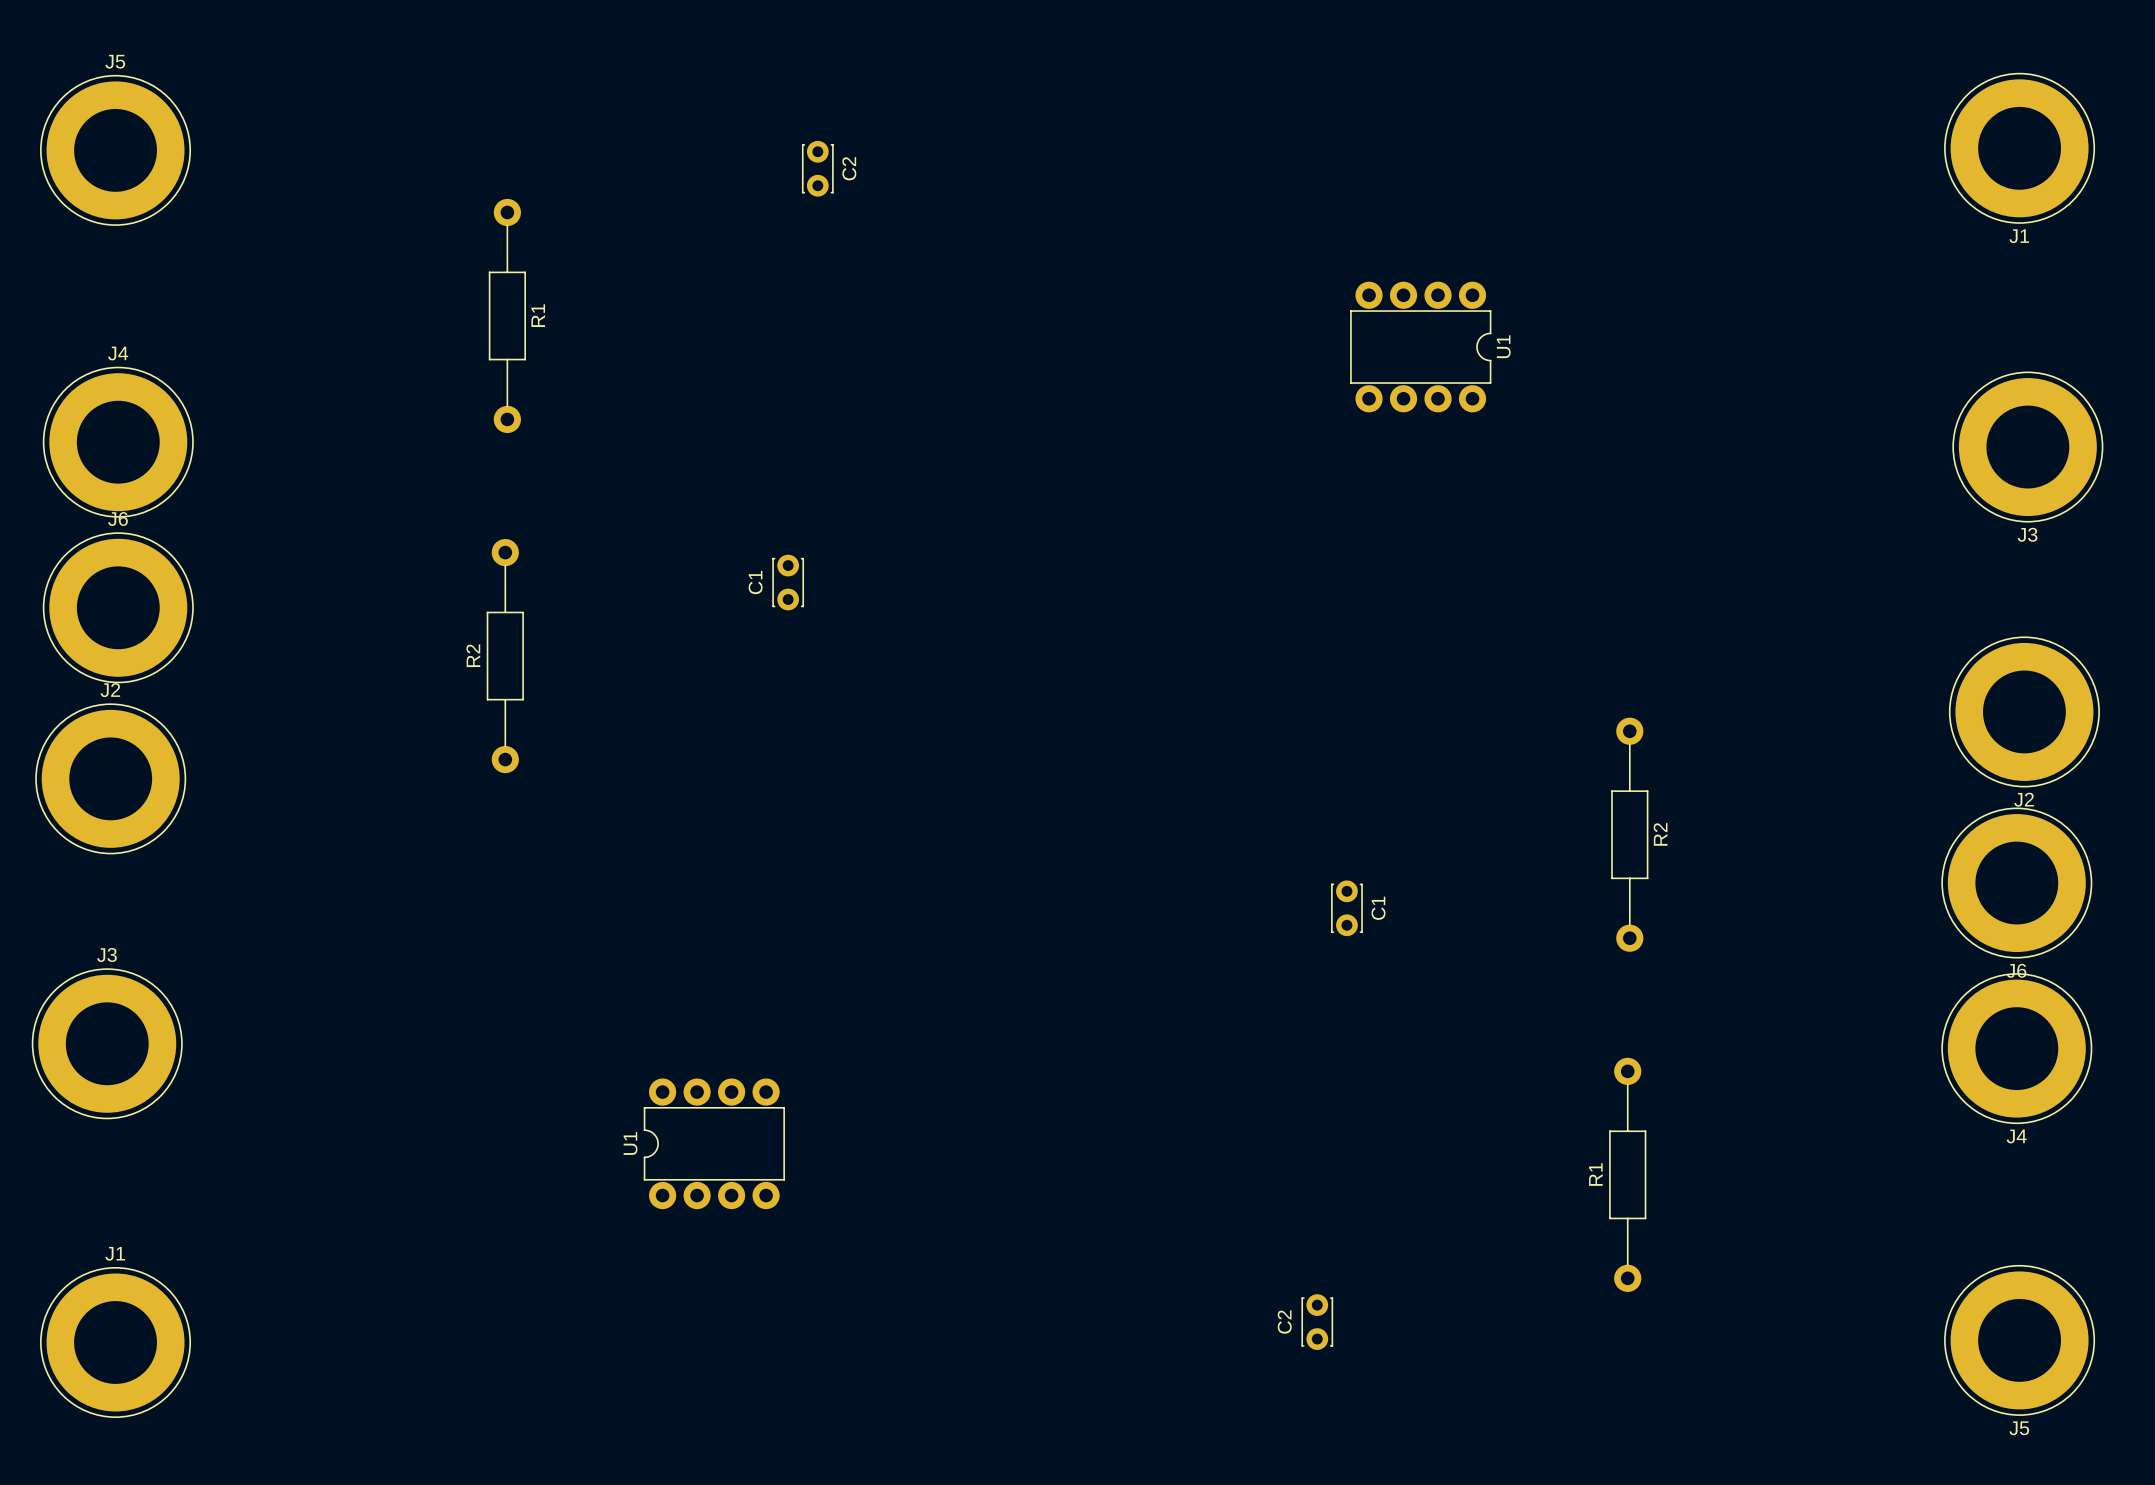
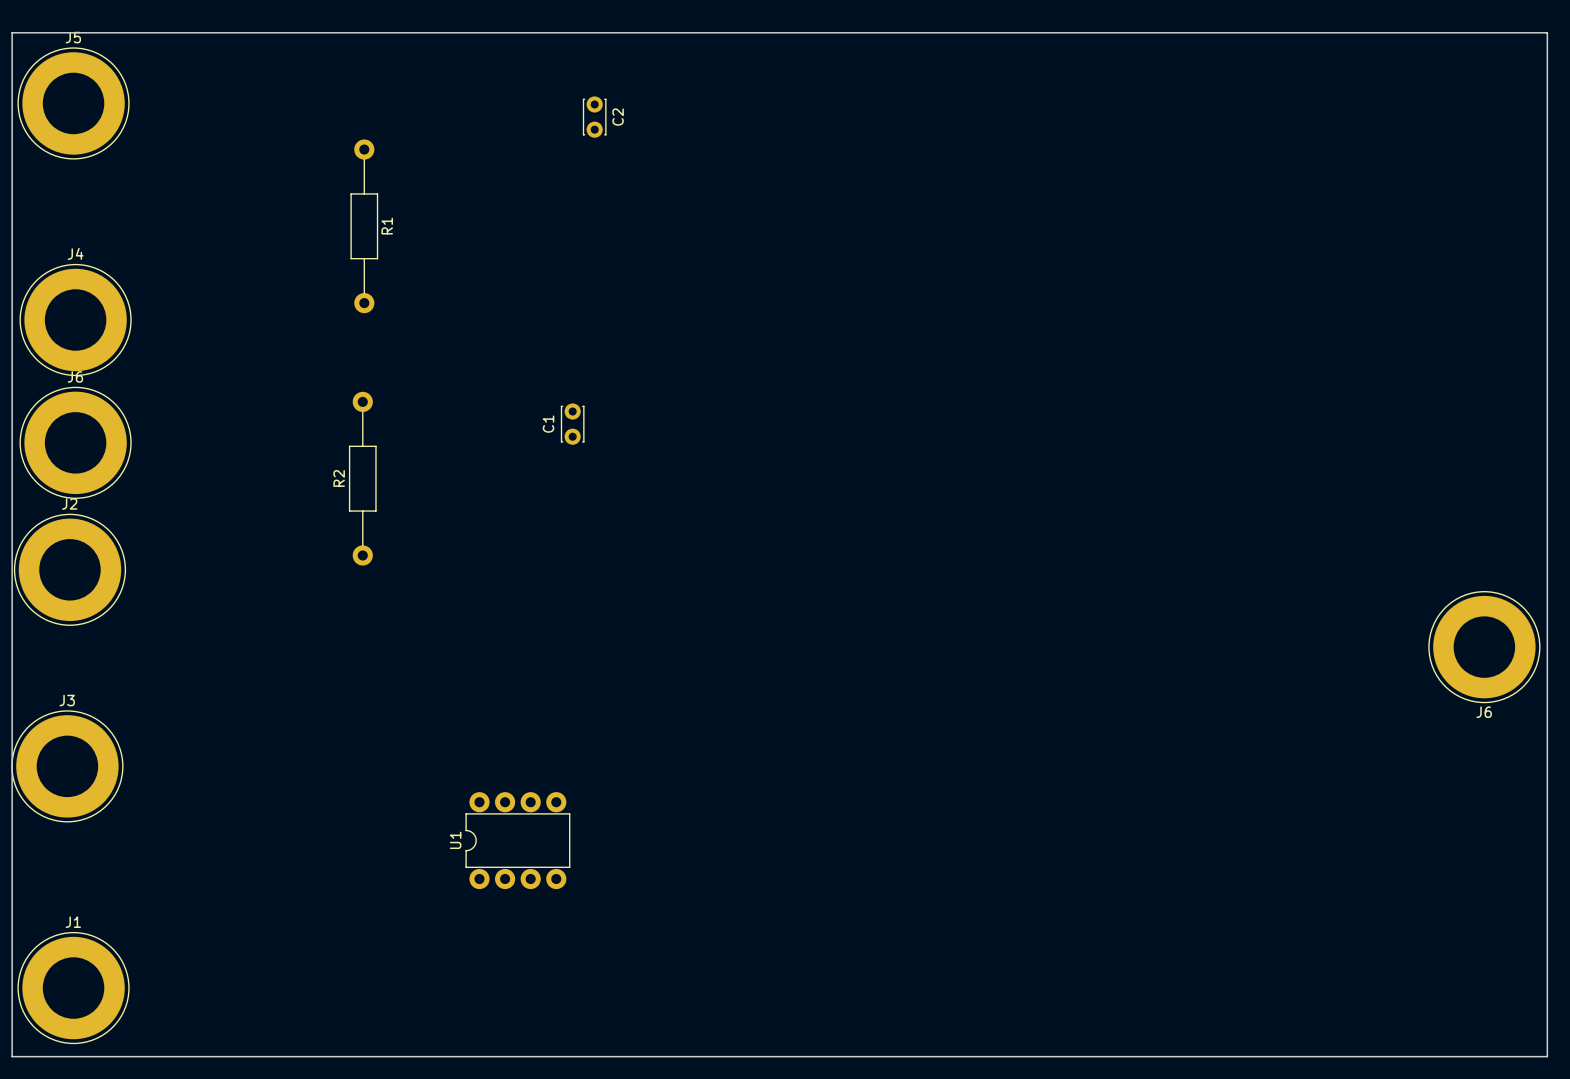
board edge: none -> (12, 32) (12, 1056) (1547, 1056) (1547, 32) (12, 32)
J1: (2019, 148) -> none
U1: (1420, 347) -> none
J3: (2027, 447) -> none
J2: (2024, 711) -> none
R2: (1629, 834) -> none
C1: (1346, 908) -> none
J4: (2016, 1048) -> none
R1: (1627, 1174) -> none
C2: (1317, 1322) -> none
J5: (2019, 1340) -> none

